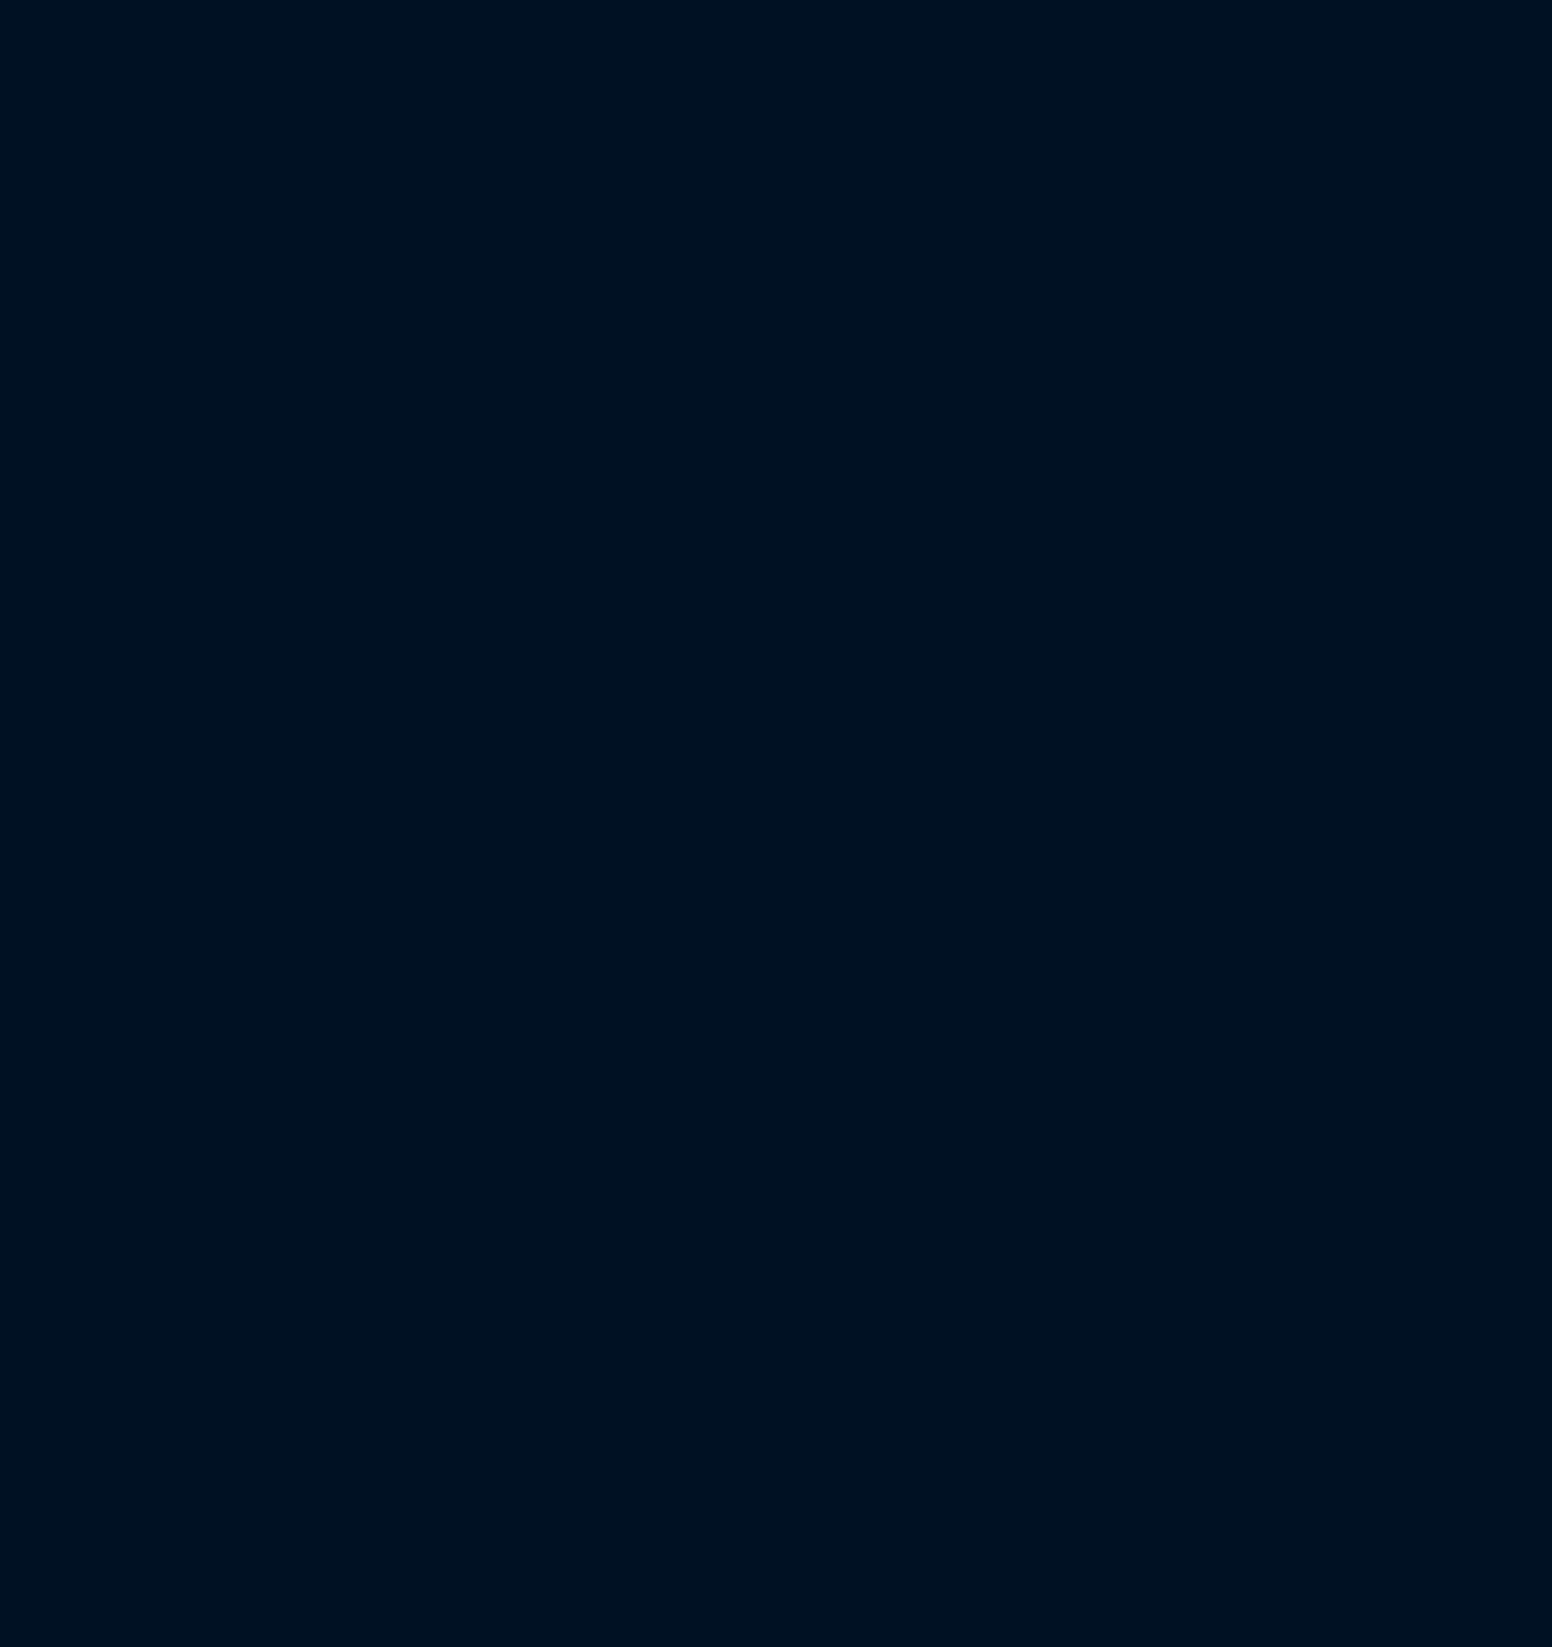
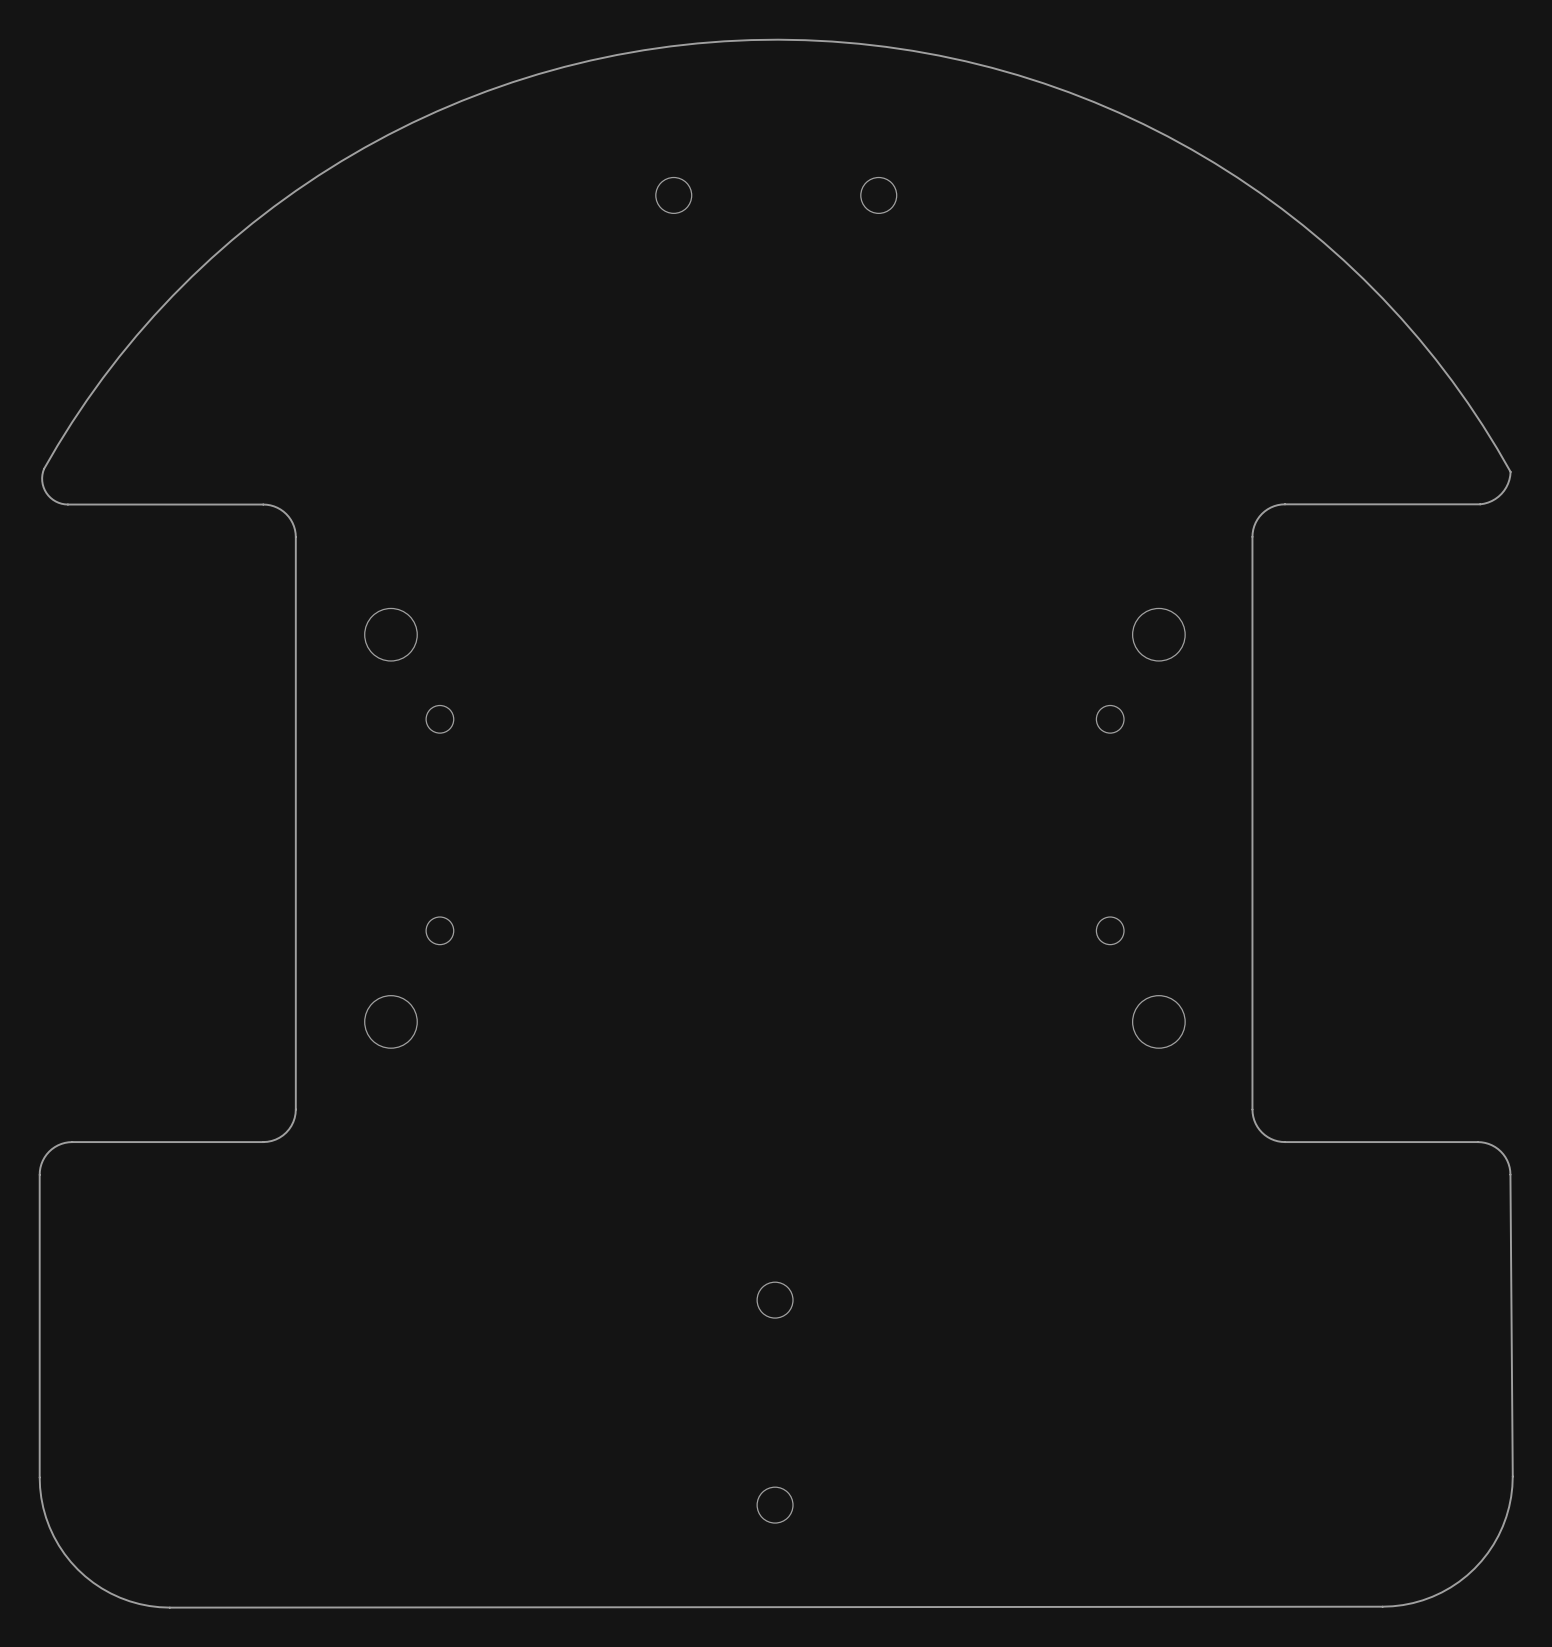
round board edge: none -> [655, 177, 693, 214]
round board edge: none -> [860, 177, 898, 214]
board edge: none -> (44, 468) (42, 481) (44, 490) (53, 499) (61, 503) (266, 504) (280, 509) (288, 516) (294, 526) (295, 537) (295, 1109) (293, 1122) (283, 1135) (267, 1141) (64, 1142) (49, 1151) (40, 1167) (39, 1477) (41, 1497) (49, 1527) (58, 1545) (77, 1569) (93, 1582) (110, 1593) (129, 1601) (149, 1606) (169, 1607) (1382, 1606) (1412, 1603) (1441, 1592) (1467, 1575) (1487, 1553) (1498, 1535) (1506, 1516) (1512, 1486) (1510, 1174) (1507, 1160) (1495, 1147) (1481, 1142) (1277, 1141) (1261, 1132) (1253, 1116) (1252, 536) (1254, 526) (1259, 516) (1267, 509) (1277, 505) (1480, 504) (1491, 501) (1501, 493) (1508, 483) (1510, 471) (1482, 425) (1452, 381) (1401, 318) (1344, 260) (1281, 208) (1214, 163) (1167, 136) (1119, 112) (1043, 83) (965, 61) (886, 46) (805, 40) (724, 41) (670, 46) (617, 54) (538, 74) (461, 100) (412, 122) (364, 147) (295, 190) (252, 223) (211, 258) (154, 315) (119, 356) (87, 400) (44, 468)
round board edge: none -> [364, 608, 418, 662]
round board edge: none -> [1132, 608, 1186, 662]
round board edge: none -> [425, 705, 455, 734]
round board edge: none -> [1096, 705, 1125, 734]
round board edge: none -> [425, 916, 455, 945]
round board edge: none -> [1096, 916, 1125, 945]
round board edge: none -> [364, 995, 418, 1049]
round board edge: none -> [1132, 995, 1186, 1049]
round board edge: none -> [756, 1281, 794, 1319]
round board edge: none -> [756, 1486, 794, 1524]

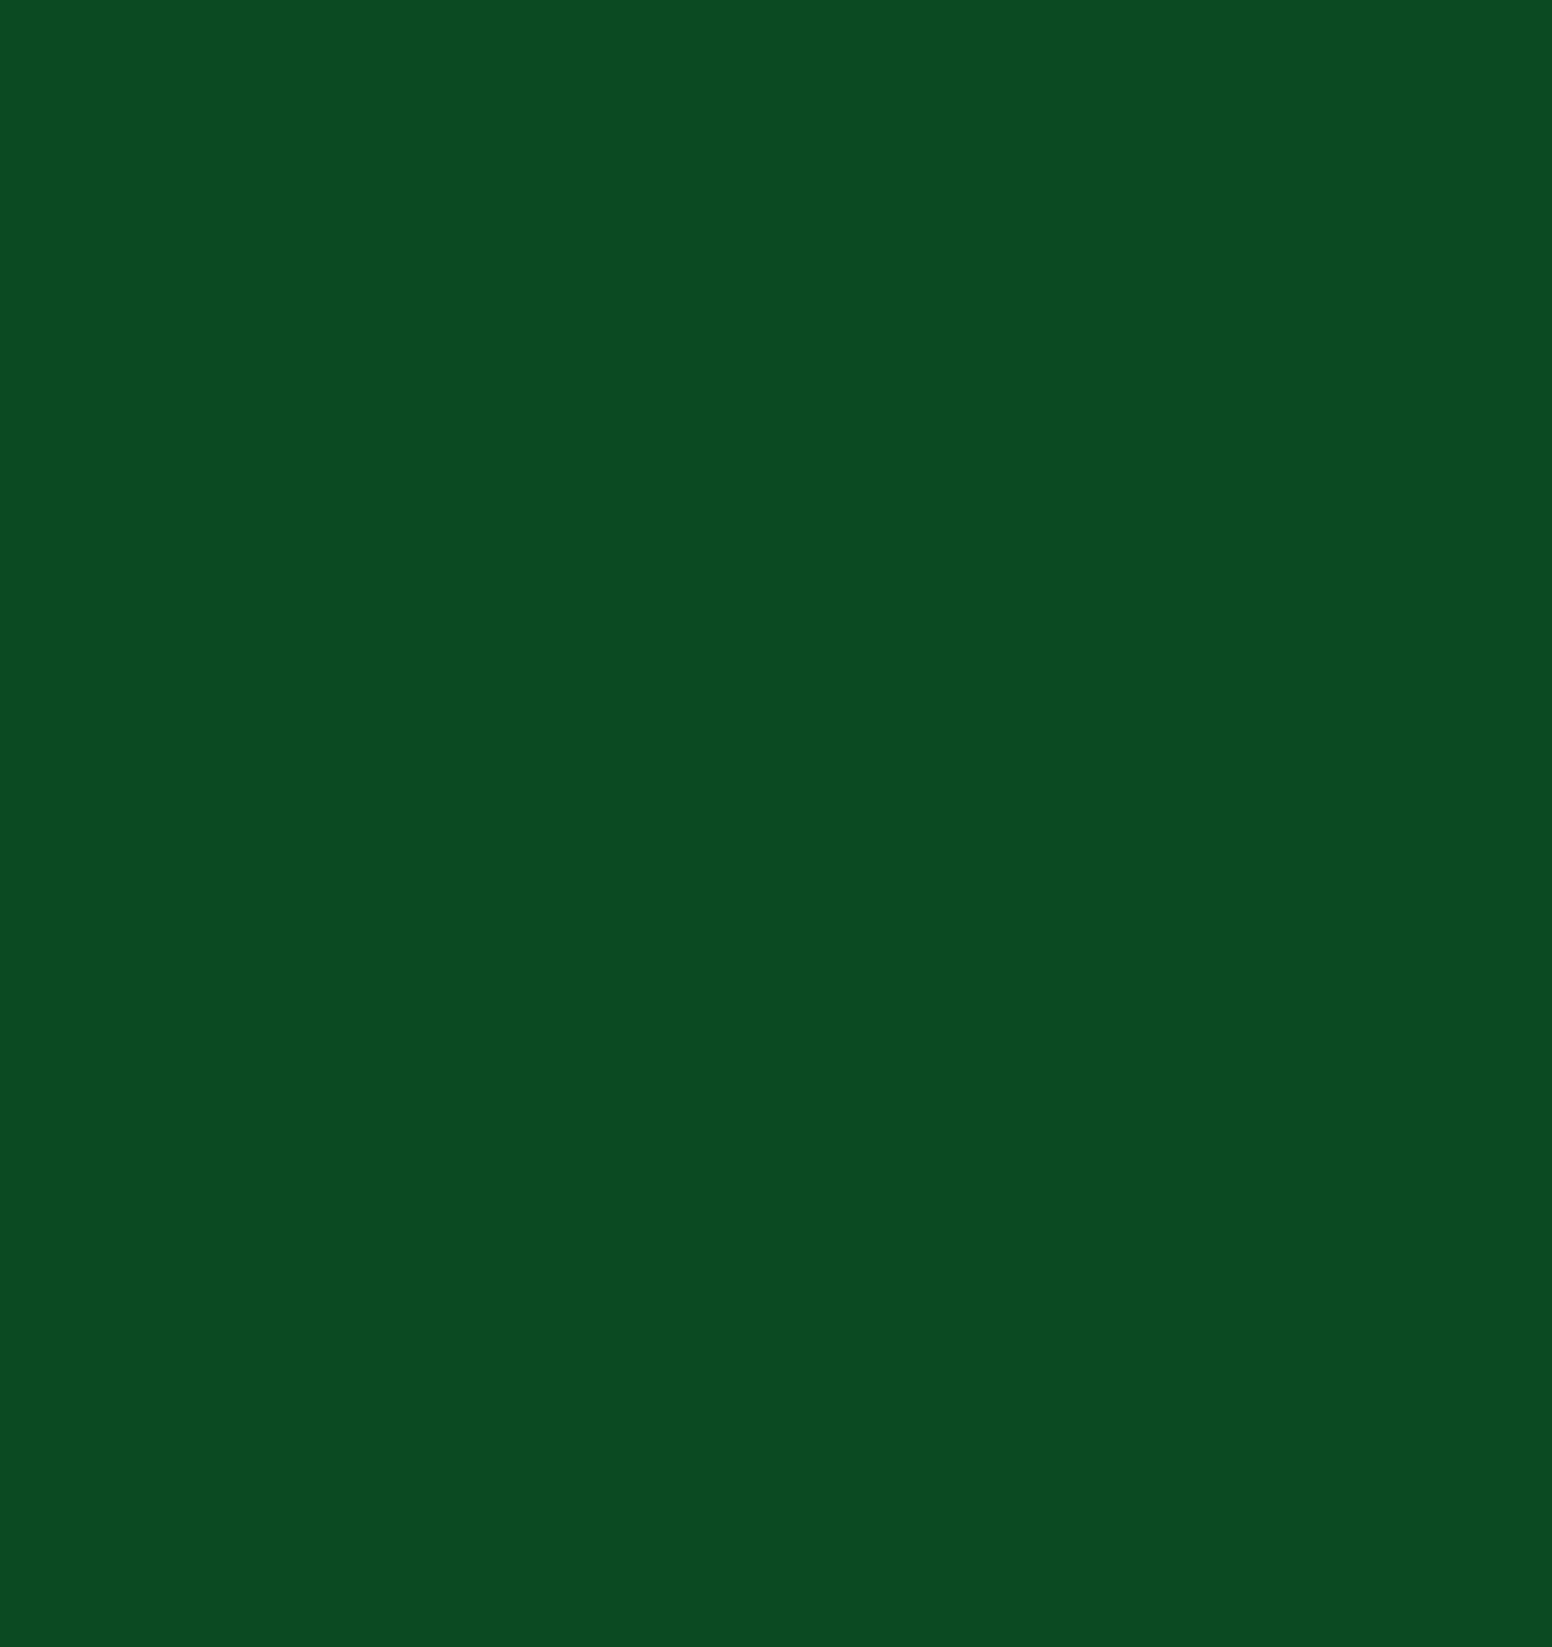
round board edge: [655, 177, 693, 214] -> none
round board edge: [860, 177, 898, 214] -> none
board edge: (44, 468) (42, 481) (44, 490) (53, 499) (61, 503) (266, 504) (280, 509) (288, 516) (294, 526) (295, 537) (295, 1109) (293, 1122) (283, 1135) (267, 1141) (64, 1142) (49, 1151) (40, 1167) (39, 1477) (41, 1497) (49, 1527) (58, 1545) (77, 1569) (93, 1582) (110, 1593) (129, 1601) (149, 1606) (169, 1607) (1382, 1606) (1412, 1603) (1441, 1592) (1467, 1575) (1487, 1553) (1498, 1535) (1506, 1516) (1512, 1486) (1510, 1174) (1507, 1160) (1495, 1147) (1481, 1142) (1277, 1141) (1261, 1132) (1253, 1116) (1252, 536) (1254, 526) (1259, 516) (1267, 509) (1277, 505) (1480, 504) (1491, 501) (1501, 493) (1508, 483) (1510, 471) (1482, 425) (1452, 381) (1401, 318) (1344, 260) (1281, 208) (1214, 163) (1167, 136) (1119, 112) (1043, 83) (965, 61) (886, 46) (805, 40) (724, 41) (670, 46) (617, 54) (538, 74) (461, 100) (412, 122) (364, 147) (295, 190) (252, 223) (211, 258) (154, 315) (119, 356) (87, 400) (44, 468) -> none
round board edge: [364, 608, 418, 662] -> none
round board edge: [1132, 608, 1186, 662] -> none
round board edge: [425, 705, 455, 734] -> none
round board edge: [1096, 705, 1125, 734] -> none
round board edge: [425, 916, 455, 945] -> none
round board edge: [1096, 916, 1125, 945] -> none
round board edge: [364, 995, 418, 1049] -> none
round board edge: [1132, 995, 1186, 1049] -> none
round board edge: [756, 1281, 794, 1319] -> none
round board edge: [756, 1486, 794, 1524] -> none

